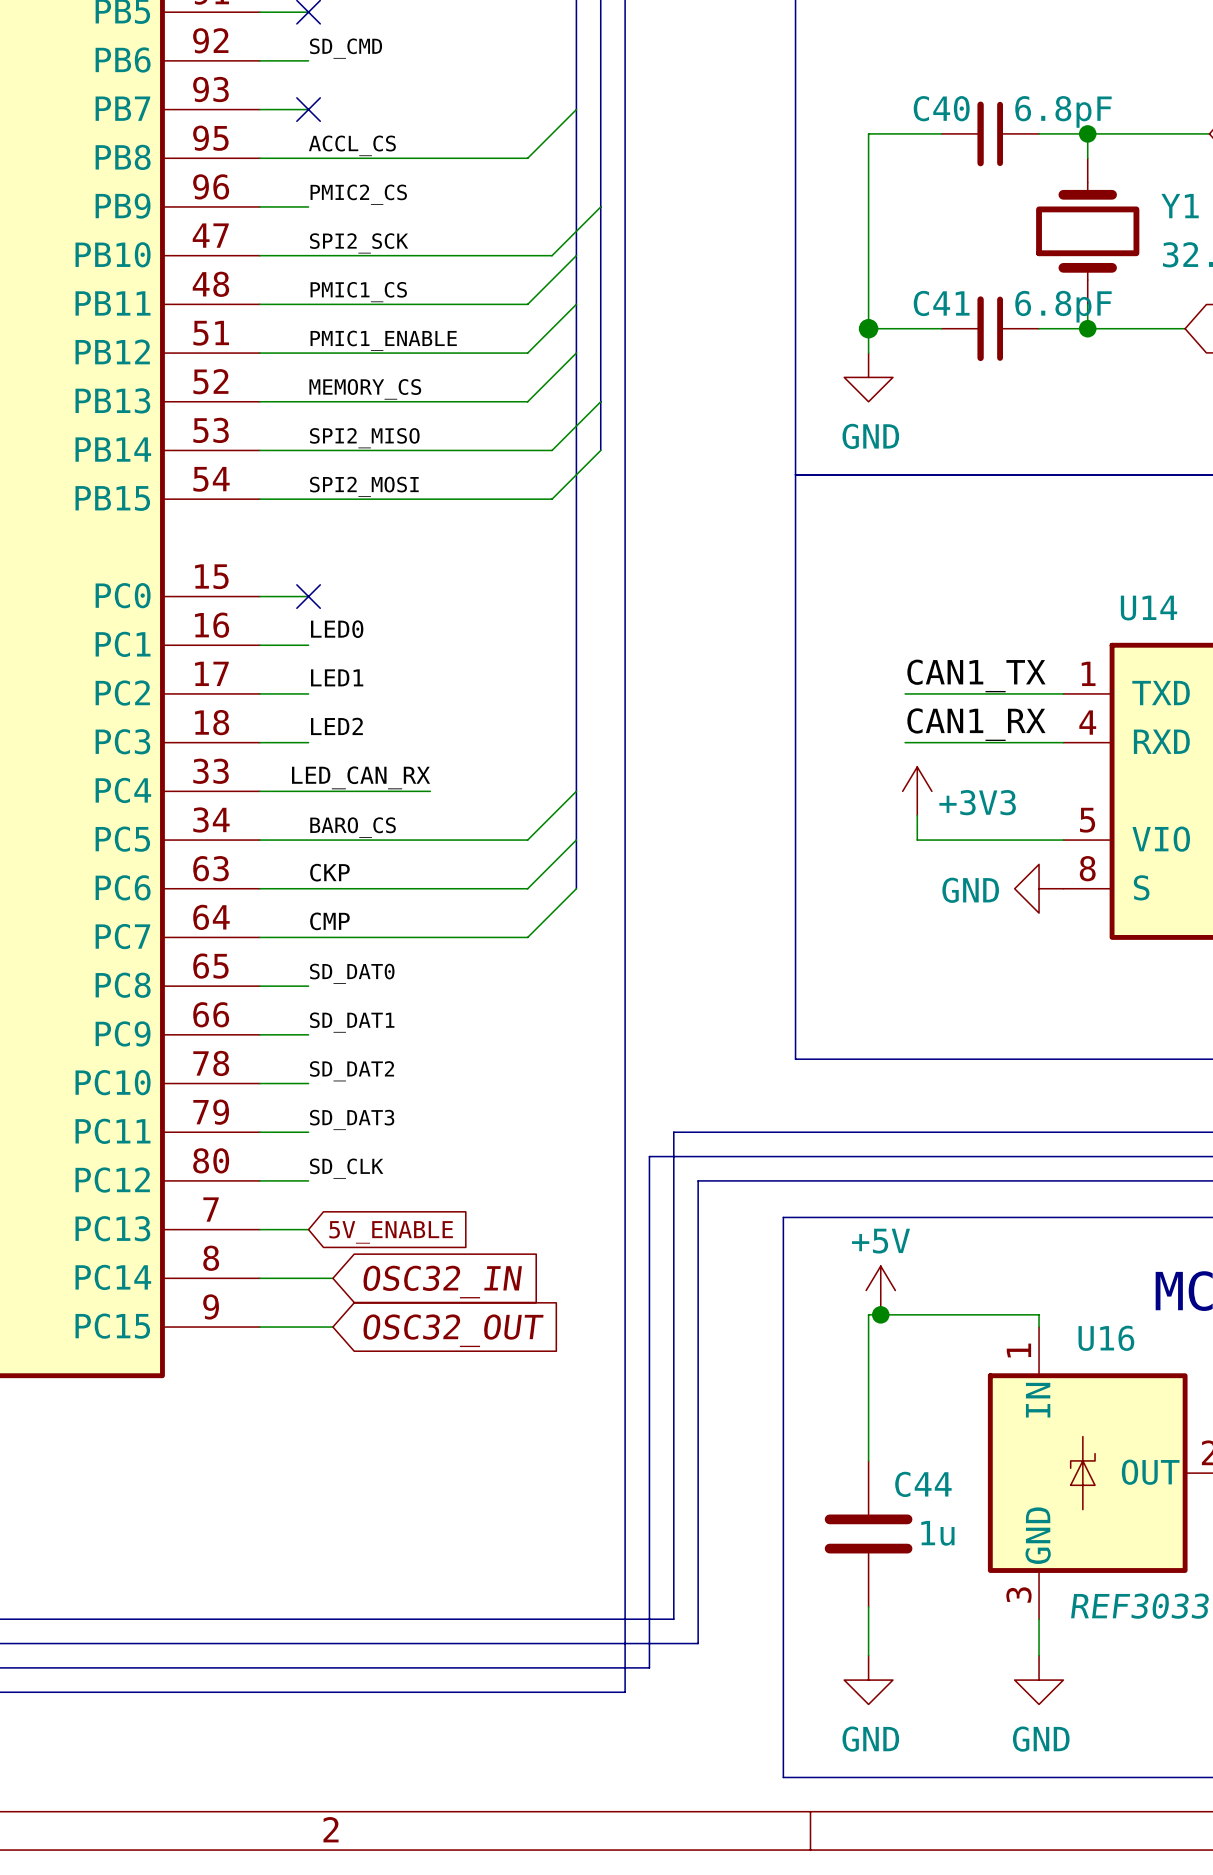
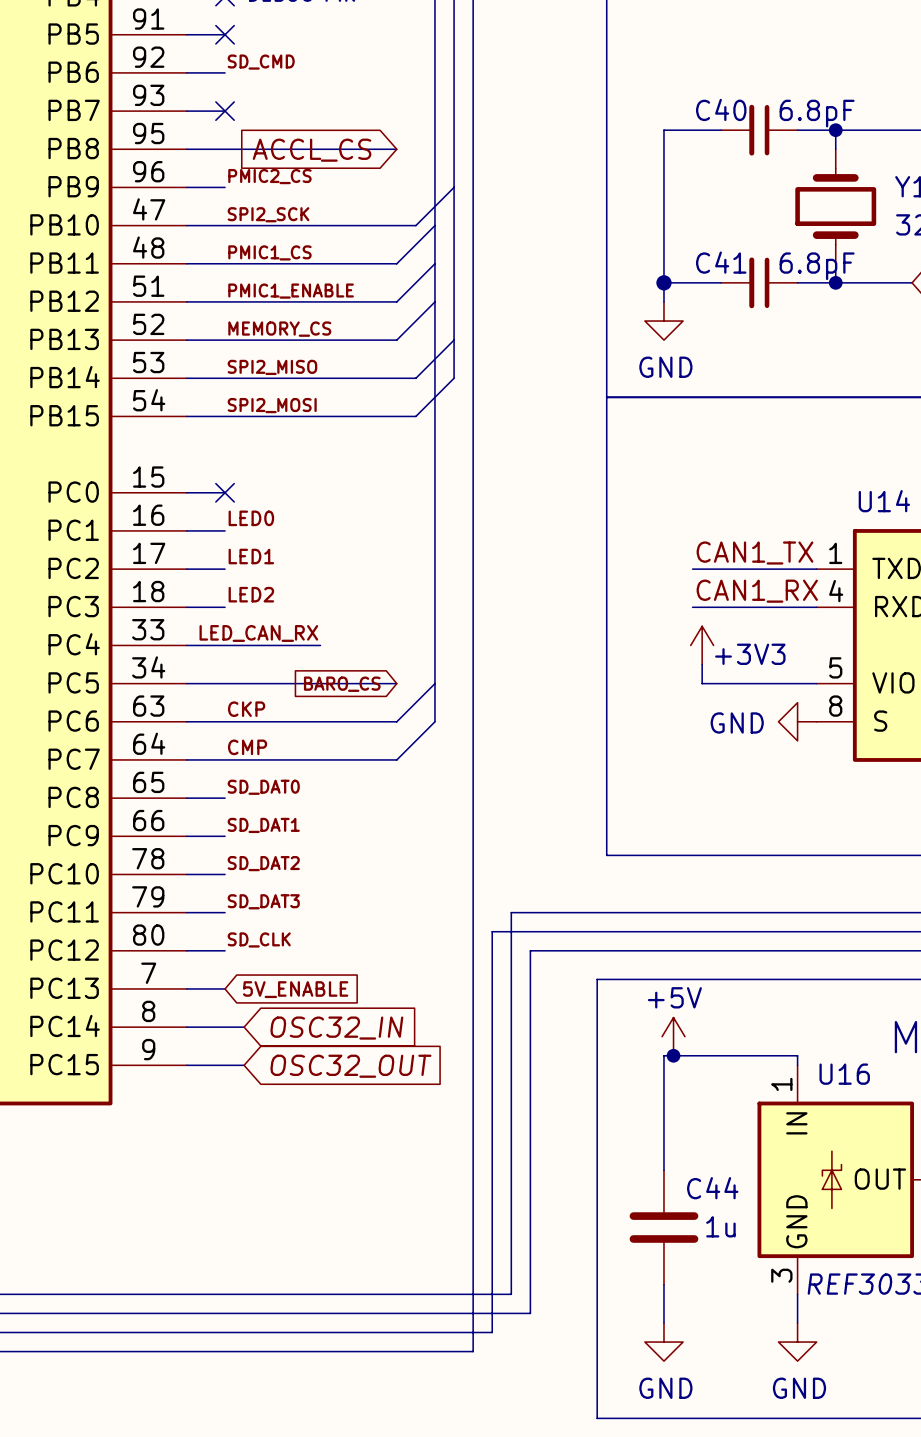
wire: (576, 109) (527, 158) -> none
label: ACCL_CS (352, 145) -> none
global label: none -> ACCL_CS (312, 150)
wire: (576, 791) (527, 840) -> none
label: BARO_CS (353, 827) -> none
global label: none -> BARO_CS (342, 684)

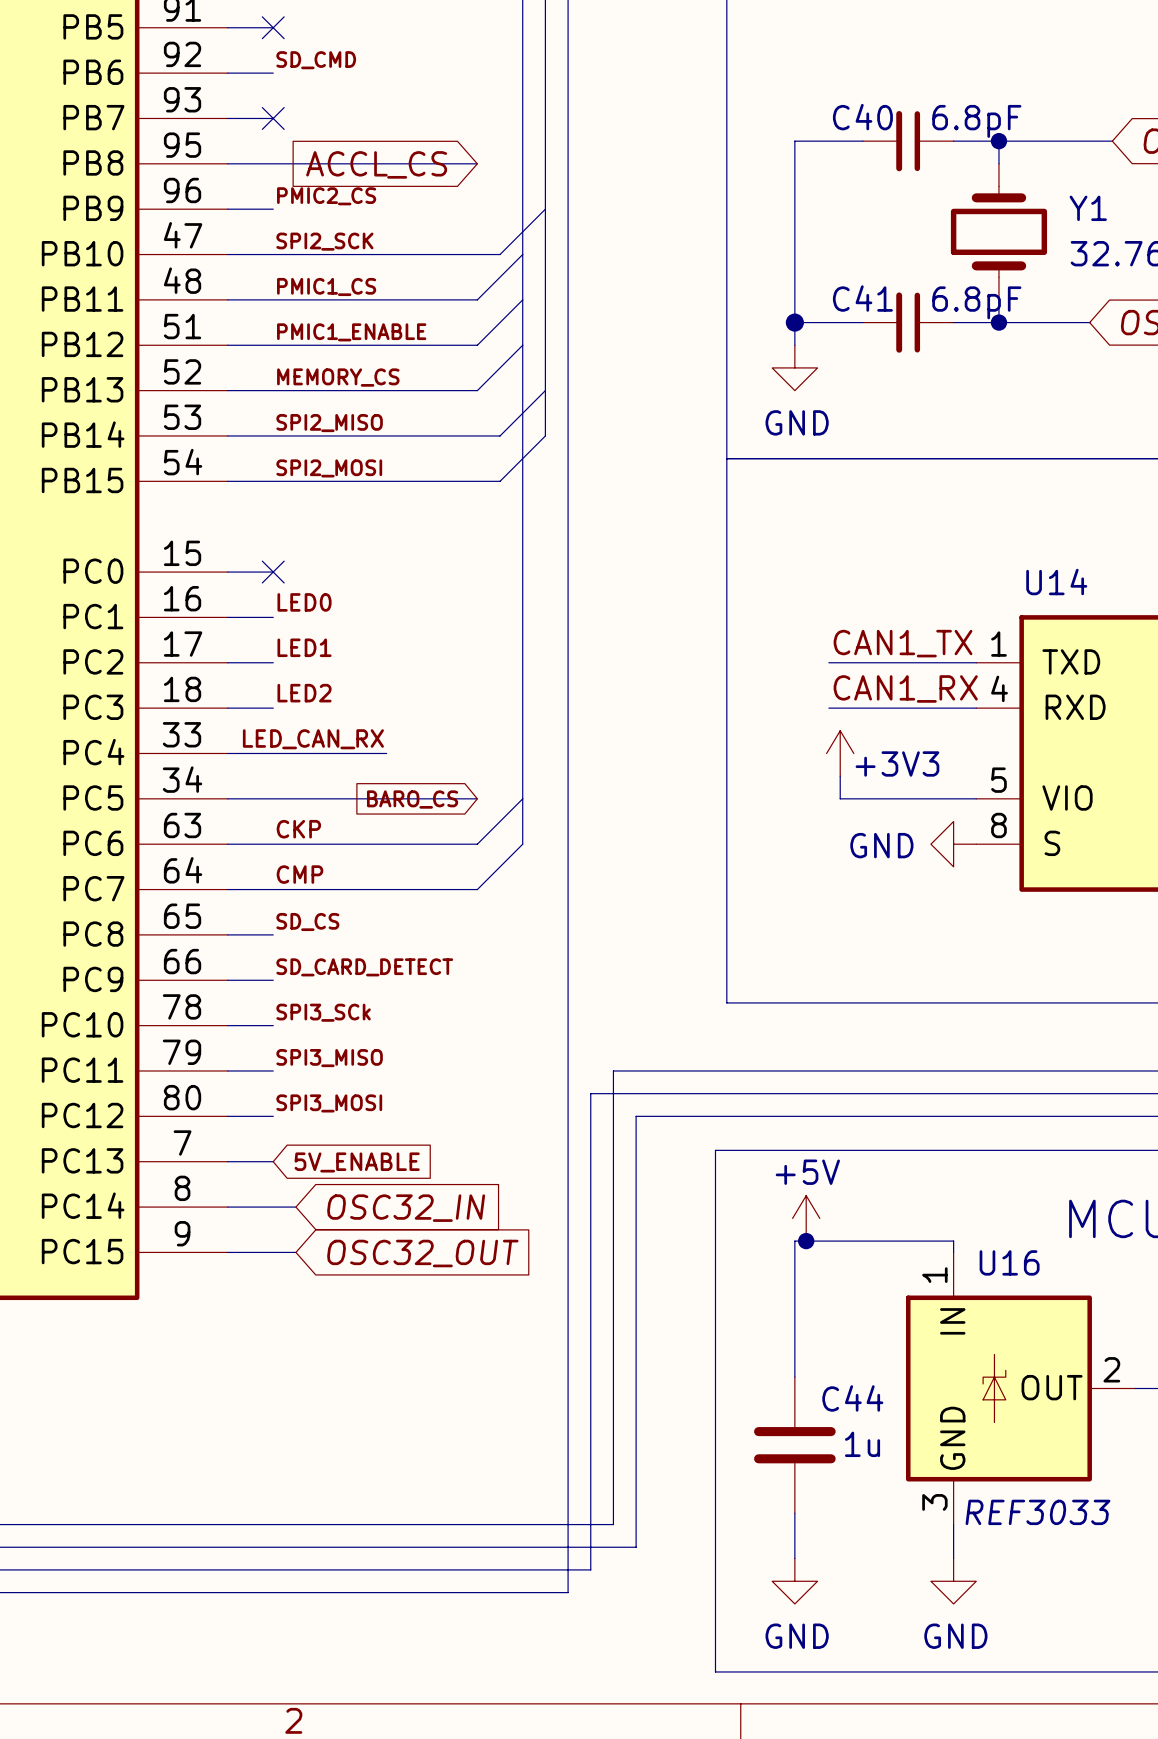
label: SD_DAT0 (263, 787) -> SD_CS (307, 922)
label: SD_DAT1 (263, 825) -> SD_CARD_DETECT (364, 967)
label: SD_DAT2 (263, 863) -> SPI3_SCk (323, 1012)
label: SD_DAT3 (263, 901) -> SPI3_MISO (329, 1058)
label: SD_CLK (259, 939) -> SPI3_MOSI (329, 1103)

